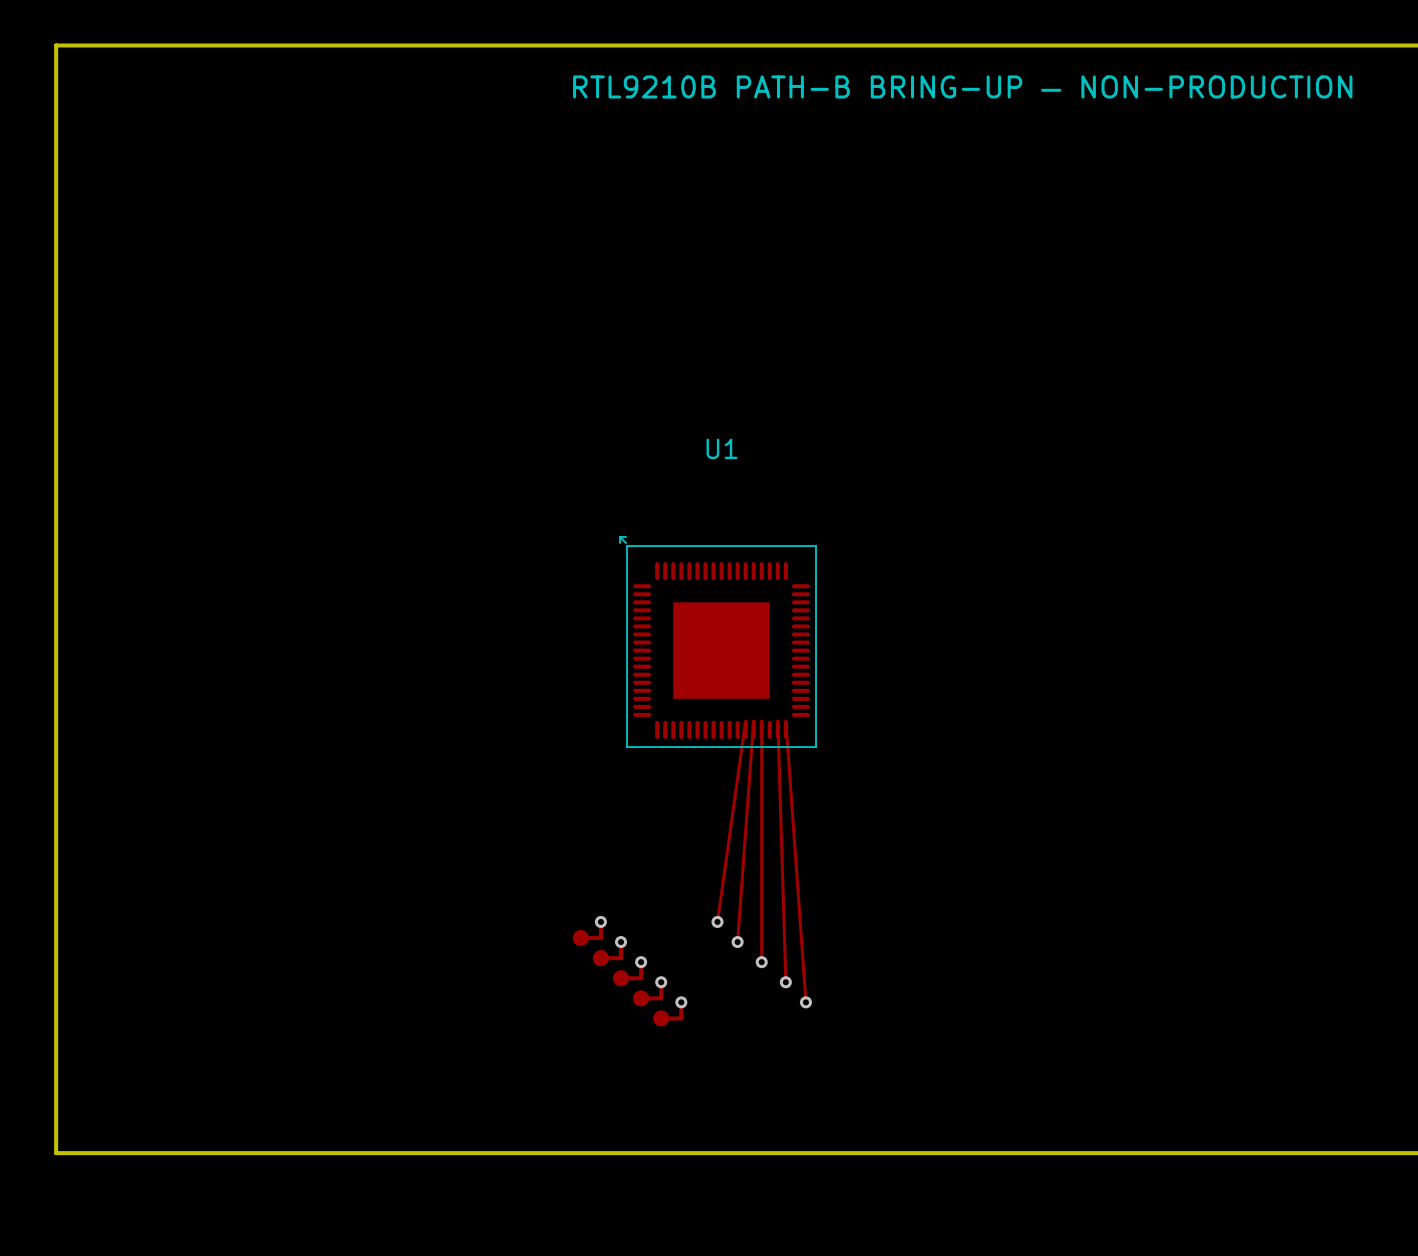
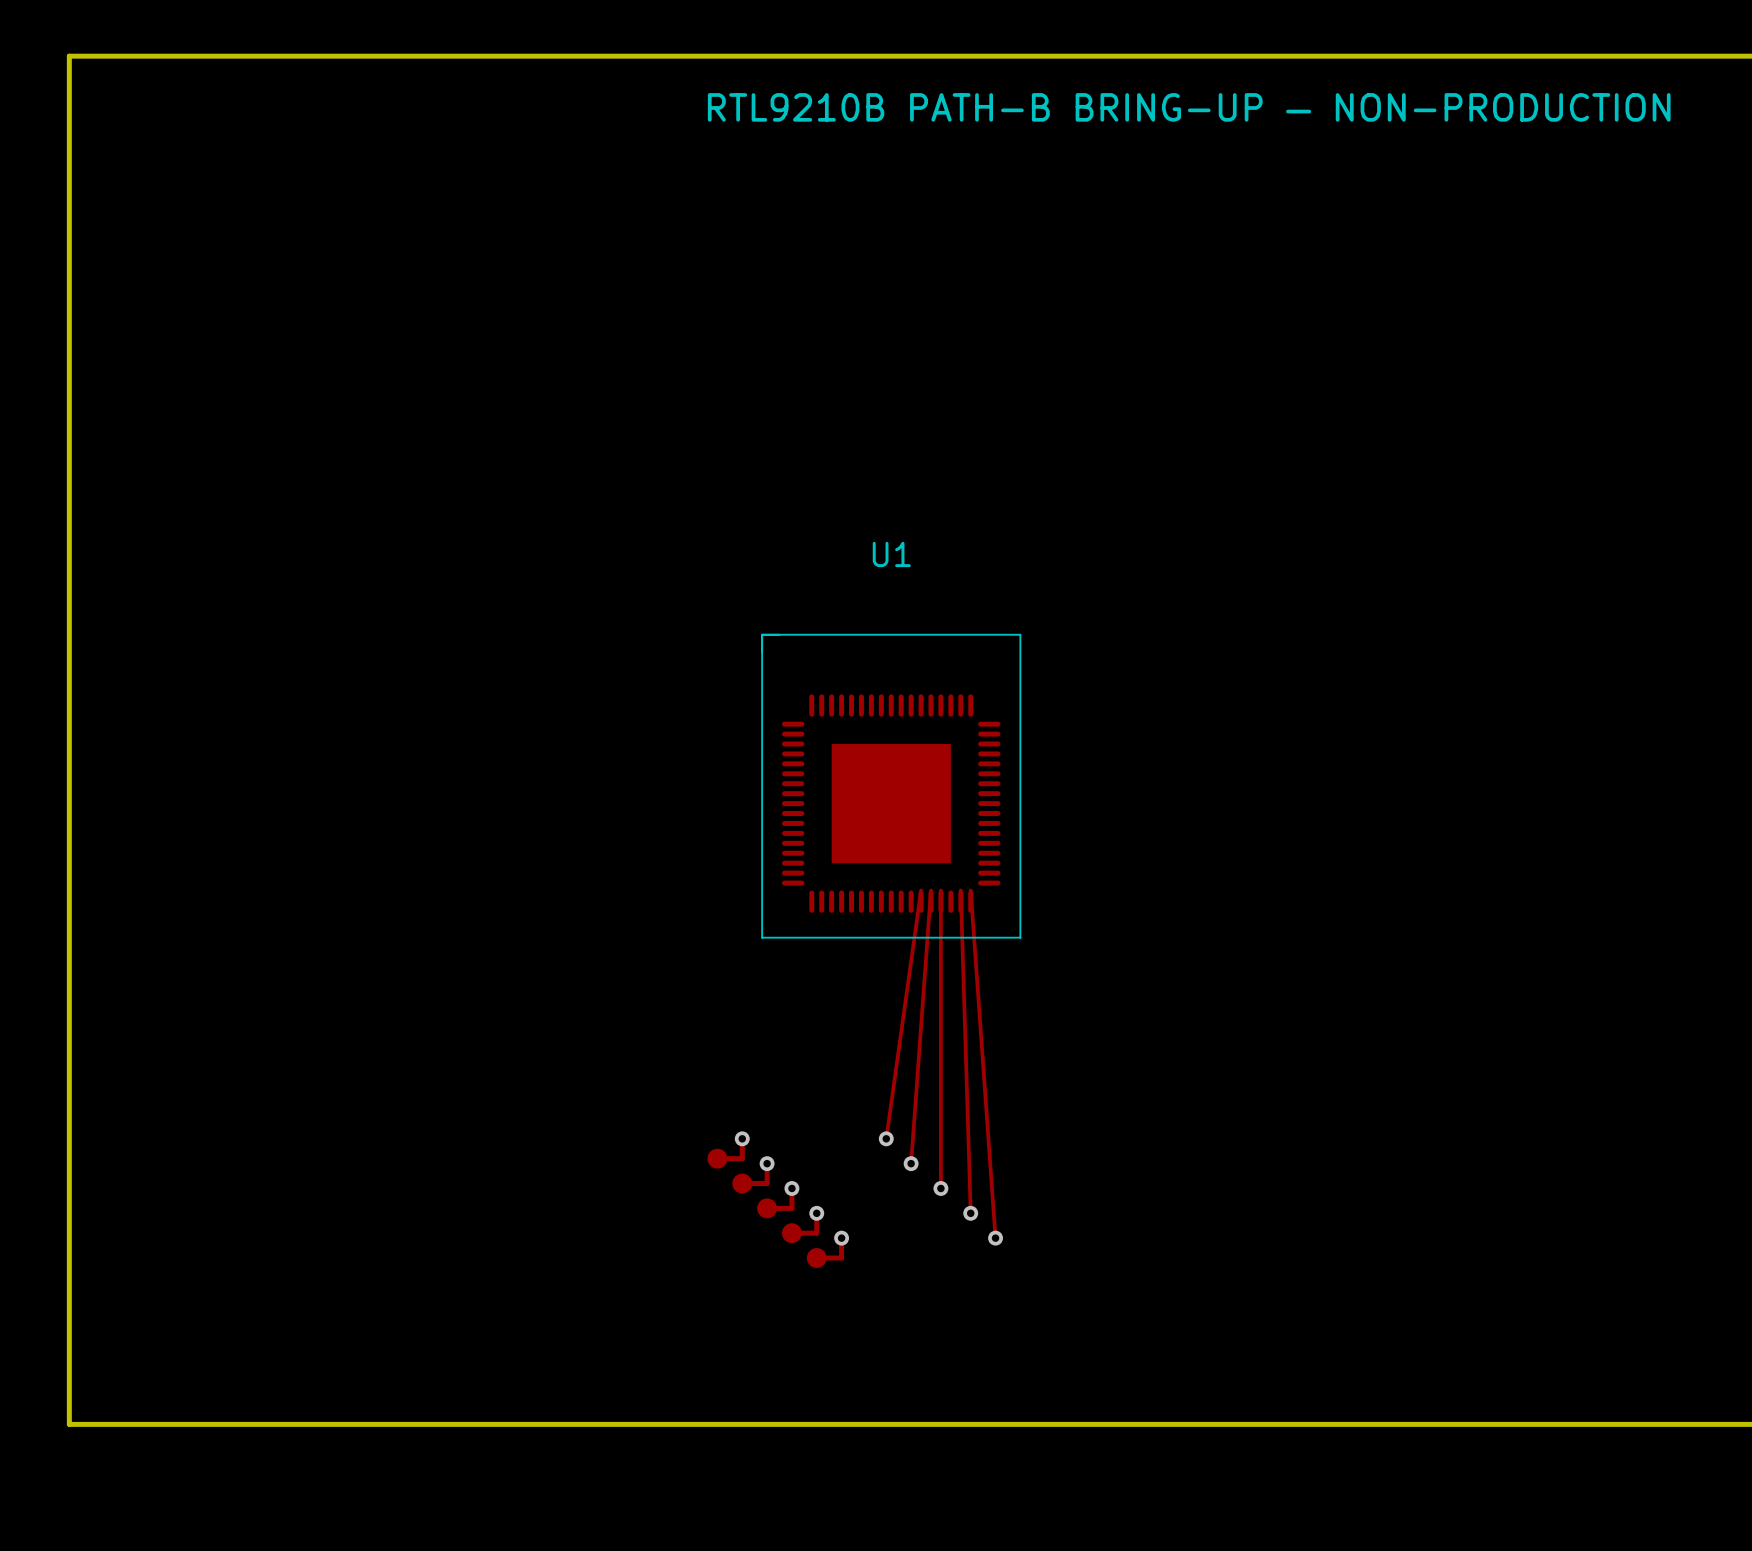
U1 footprint: [619, 536, 817, 748] -> [761, 634, 1021, 939]

